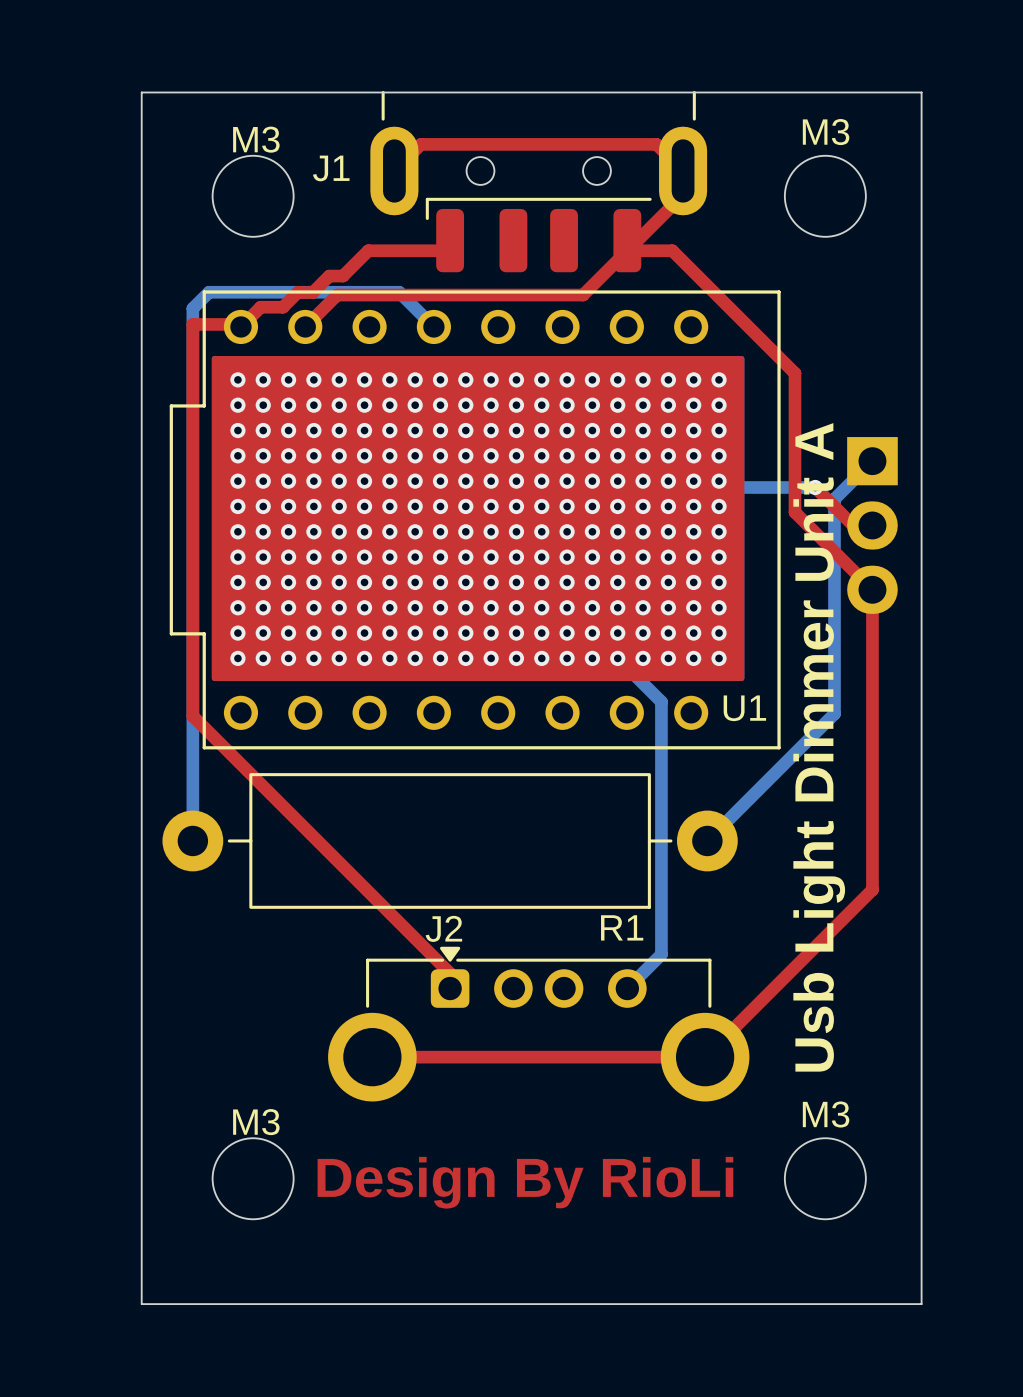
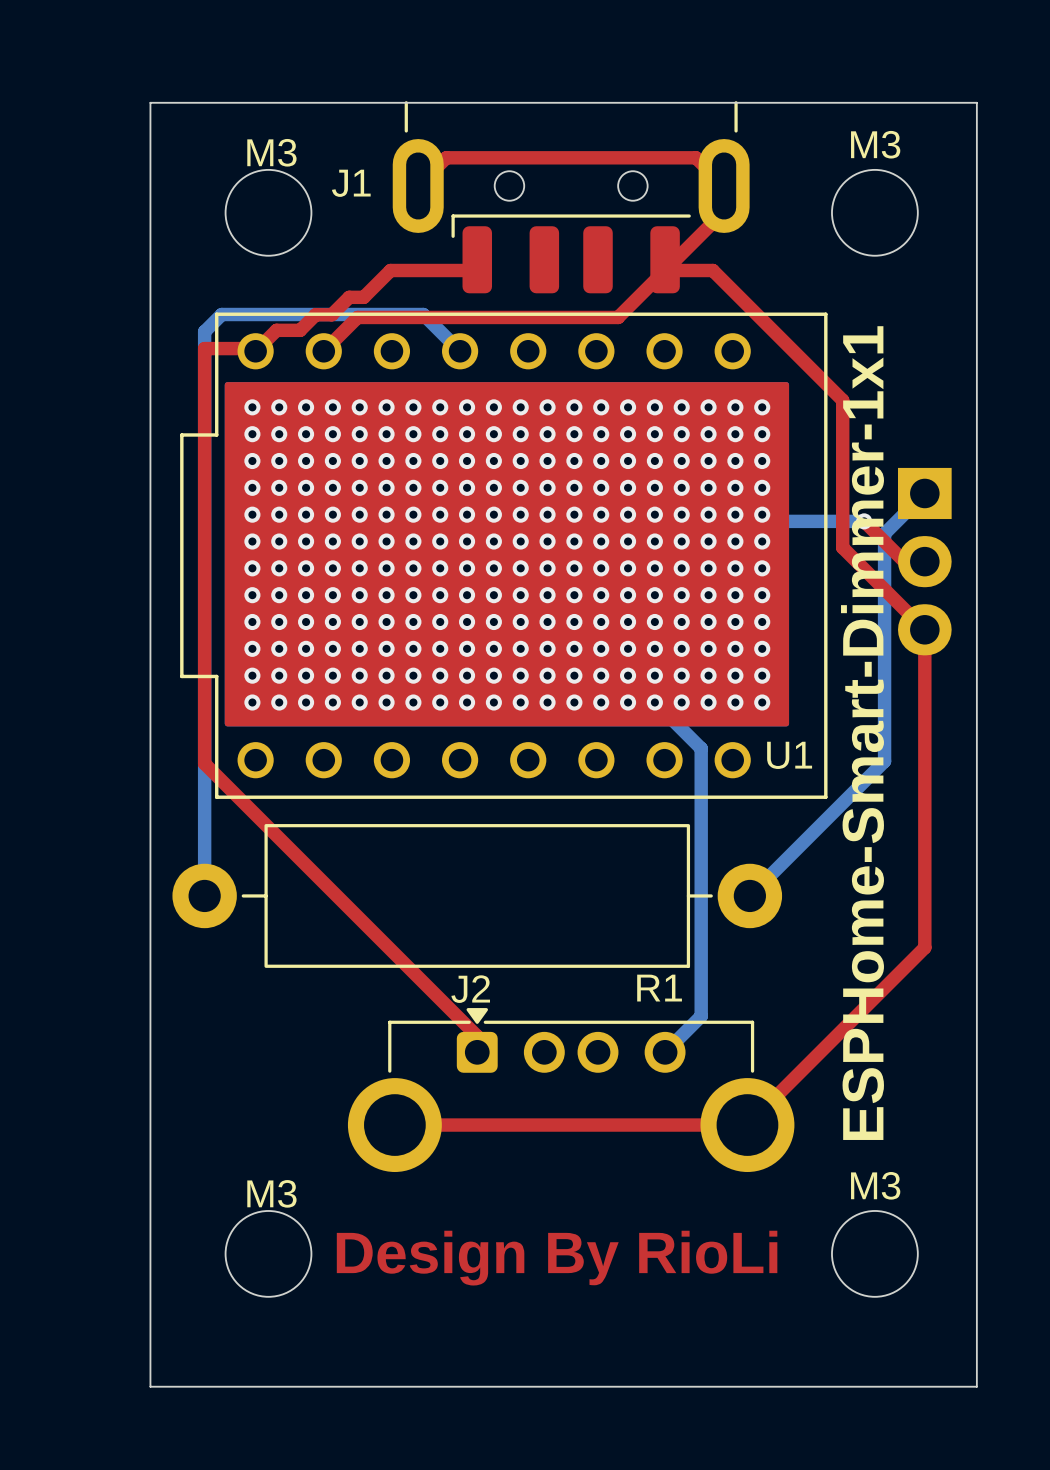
text: Usb Light Dimmer Unit A (819, 747) -> ESPHome-Smart-Dimmer-1x1 (862, 733)

